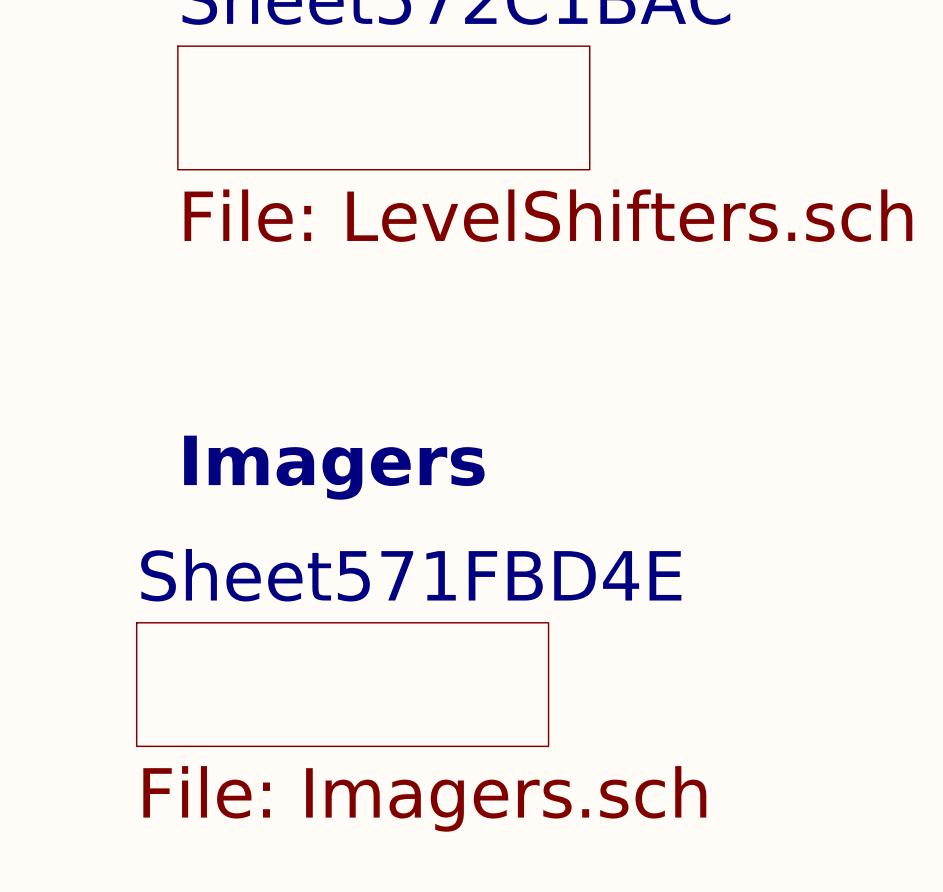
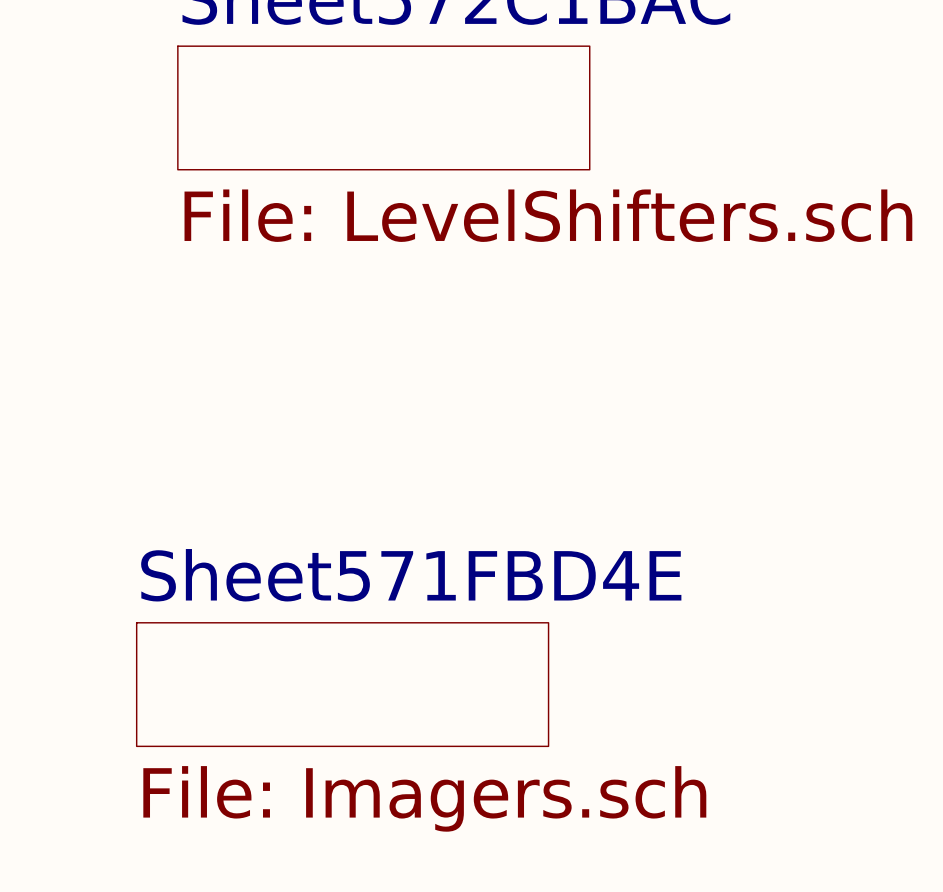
text: Imagers (334, 467) -> none

